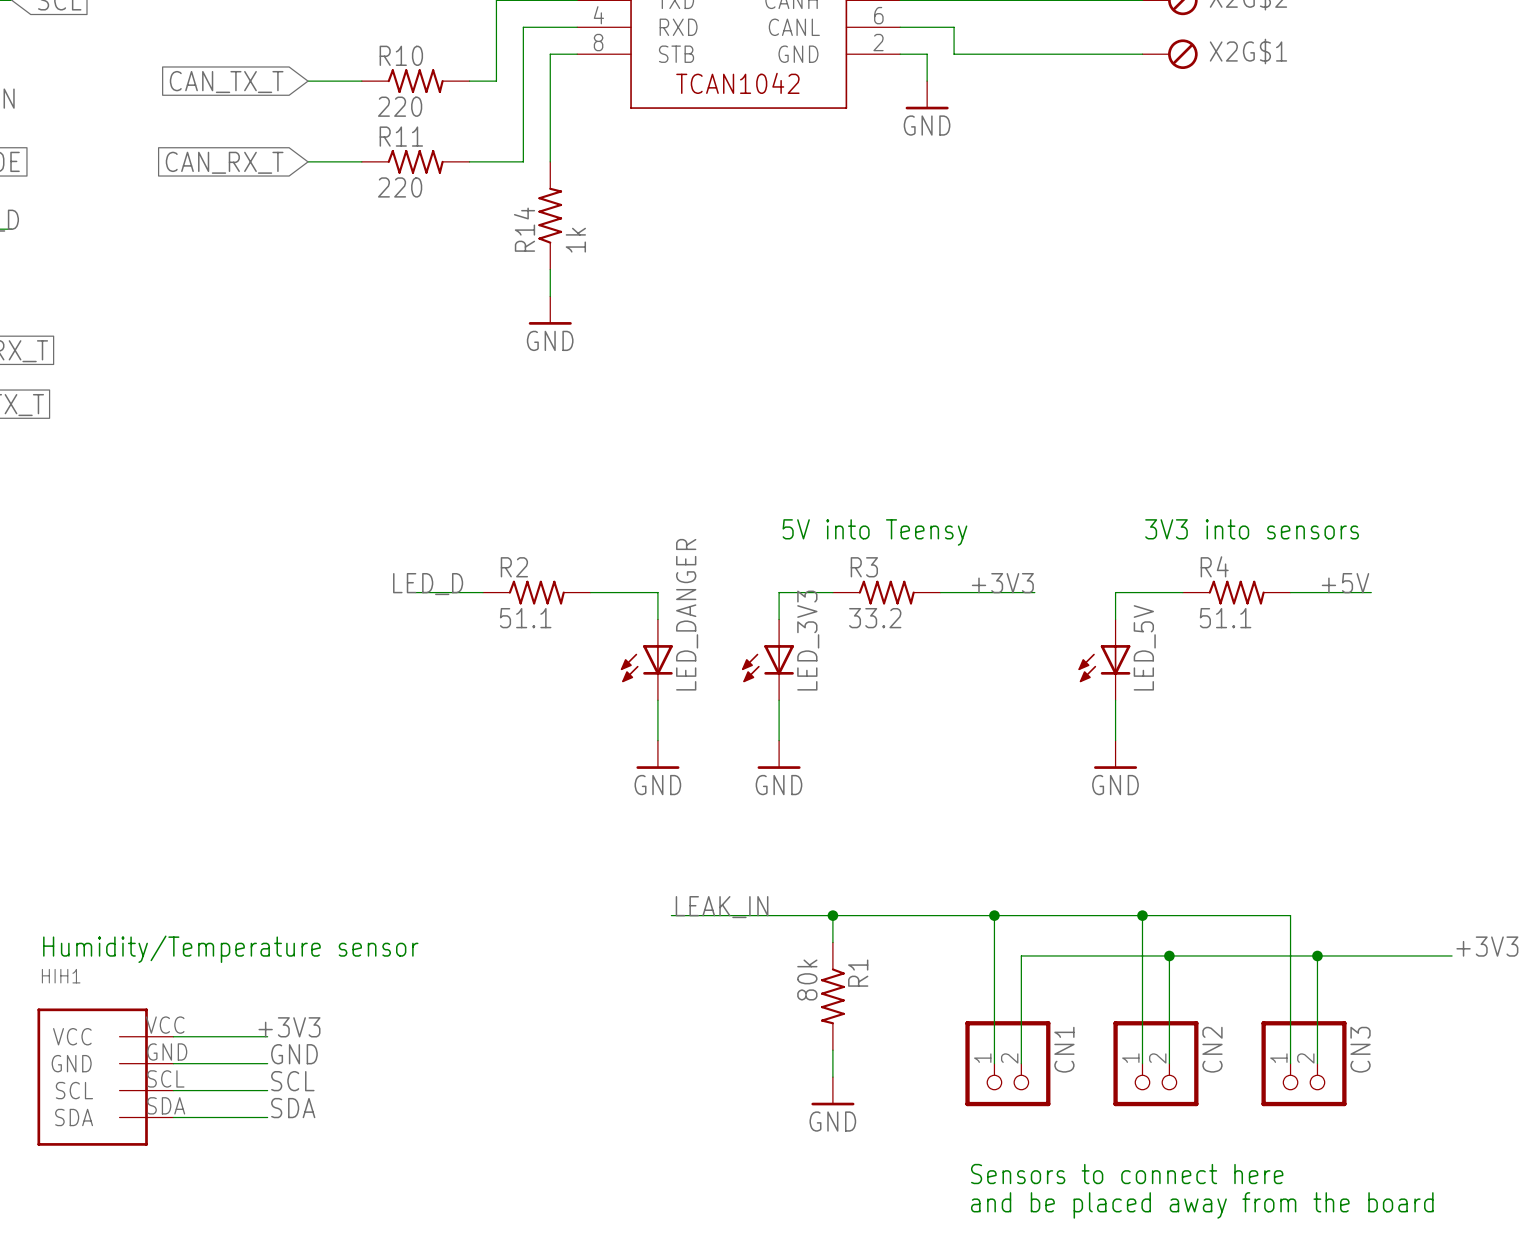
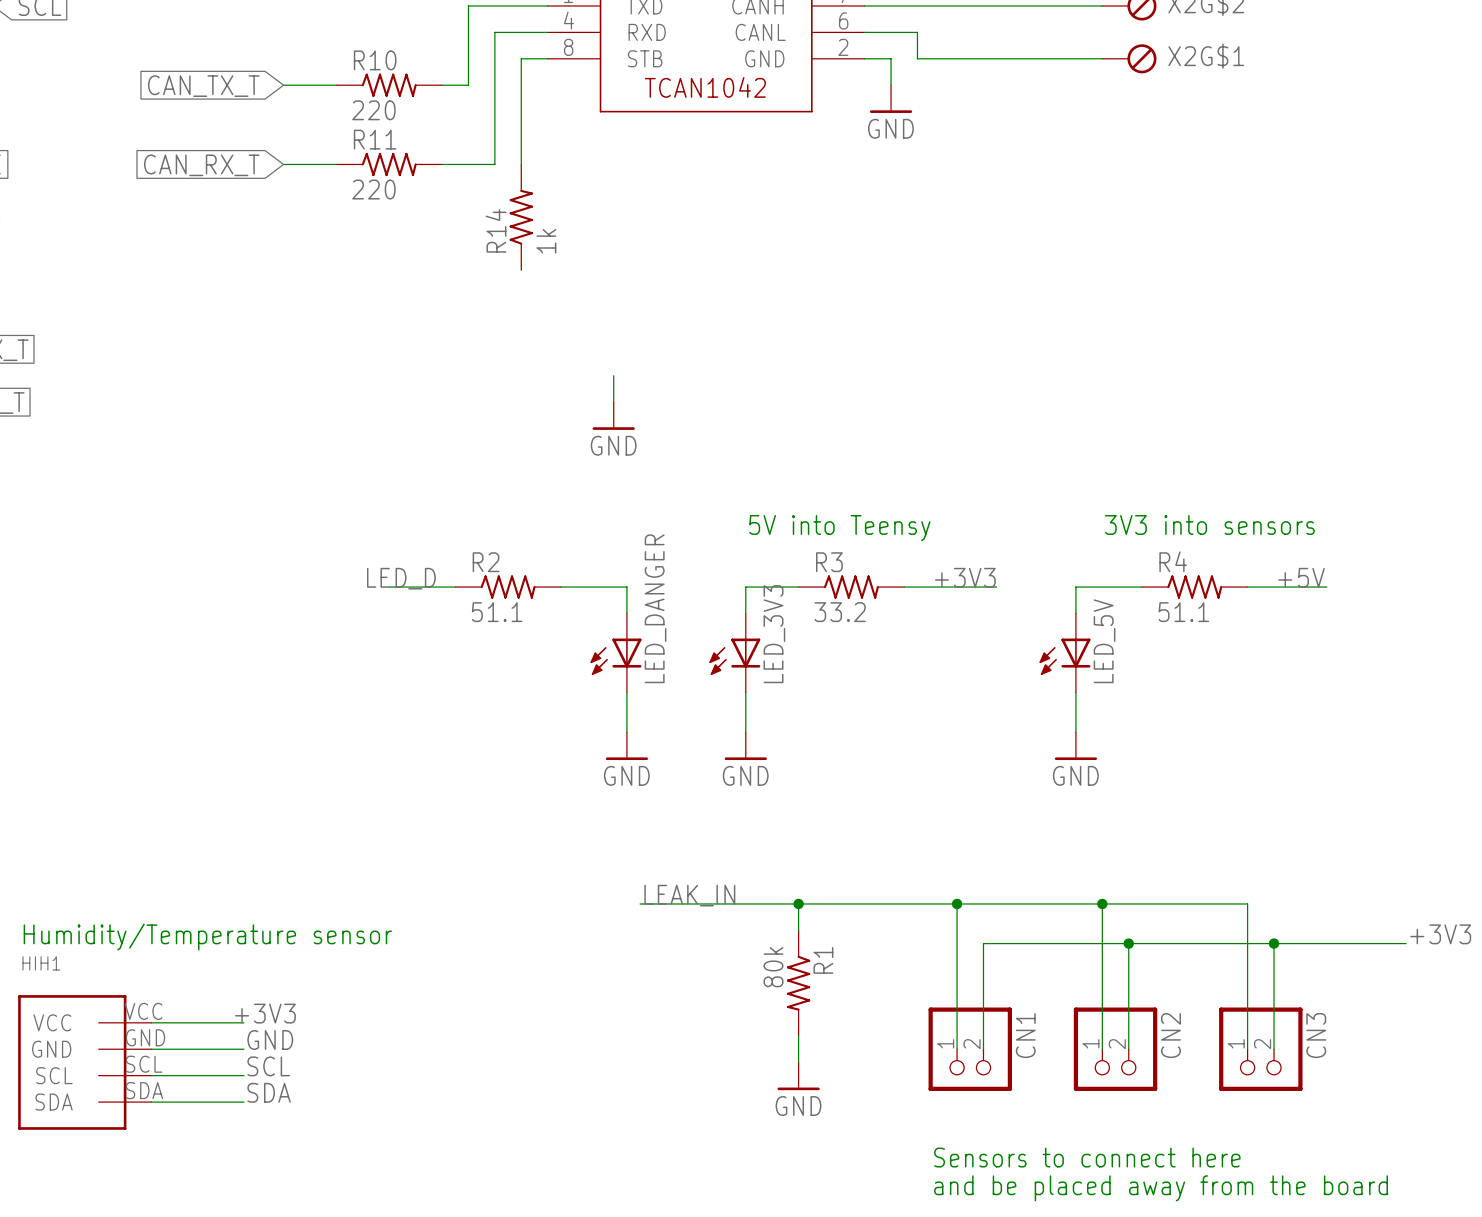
wire: (550, 269) (550, 296) -> (613, 375) (613, 402)
power symbol position: GND (550, 310) -> GND (613, 416)

